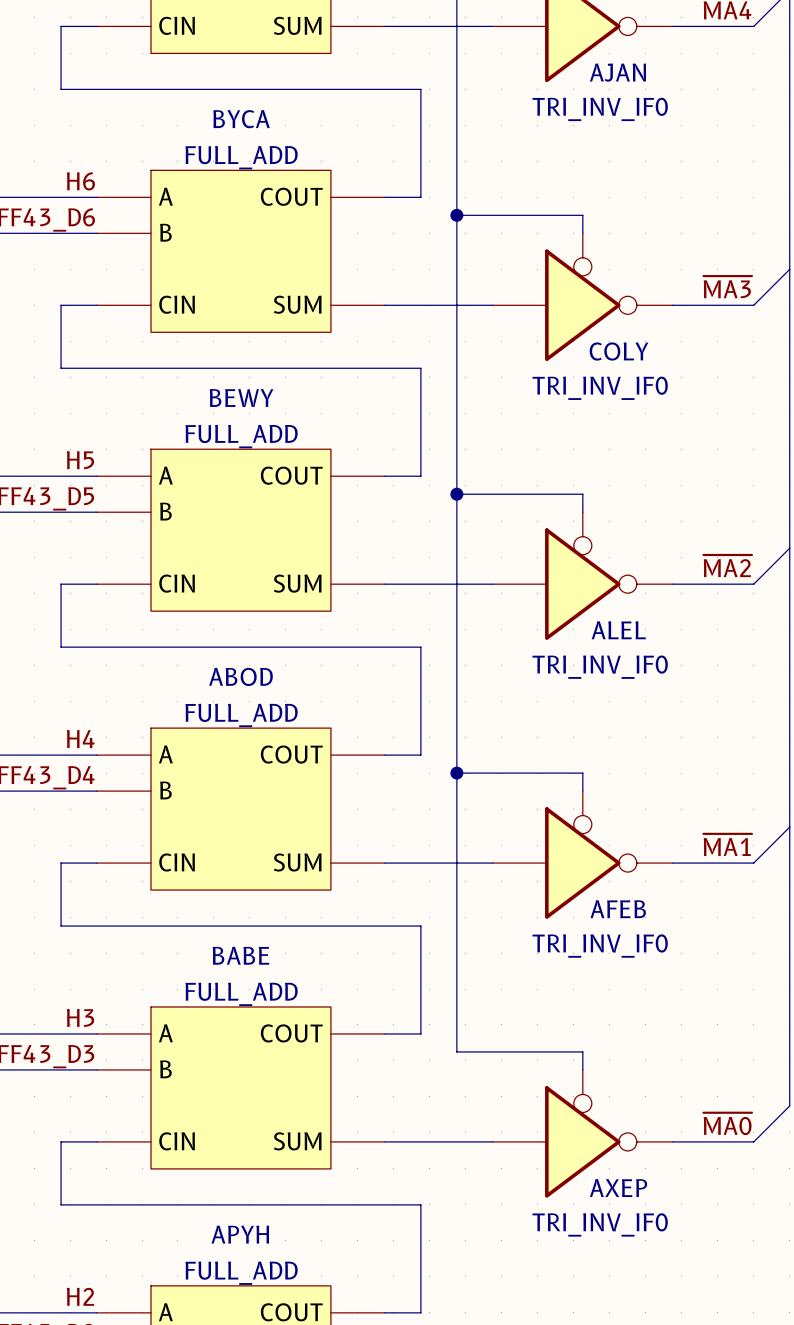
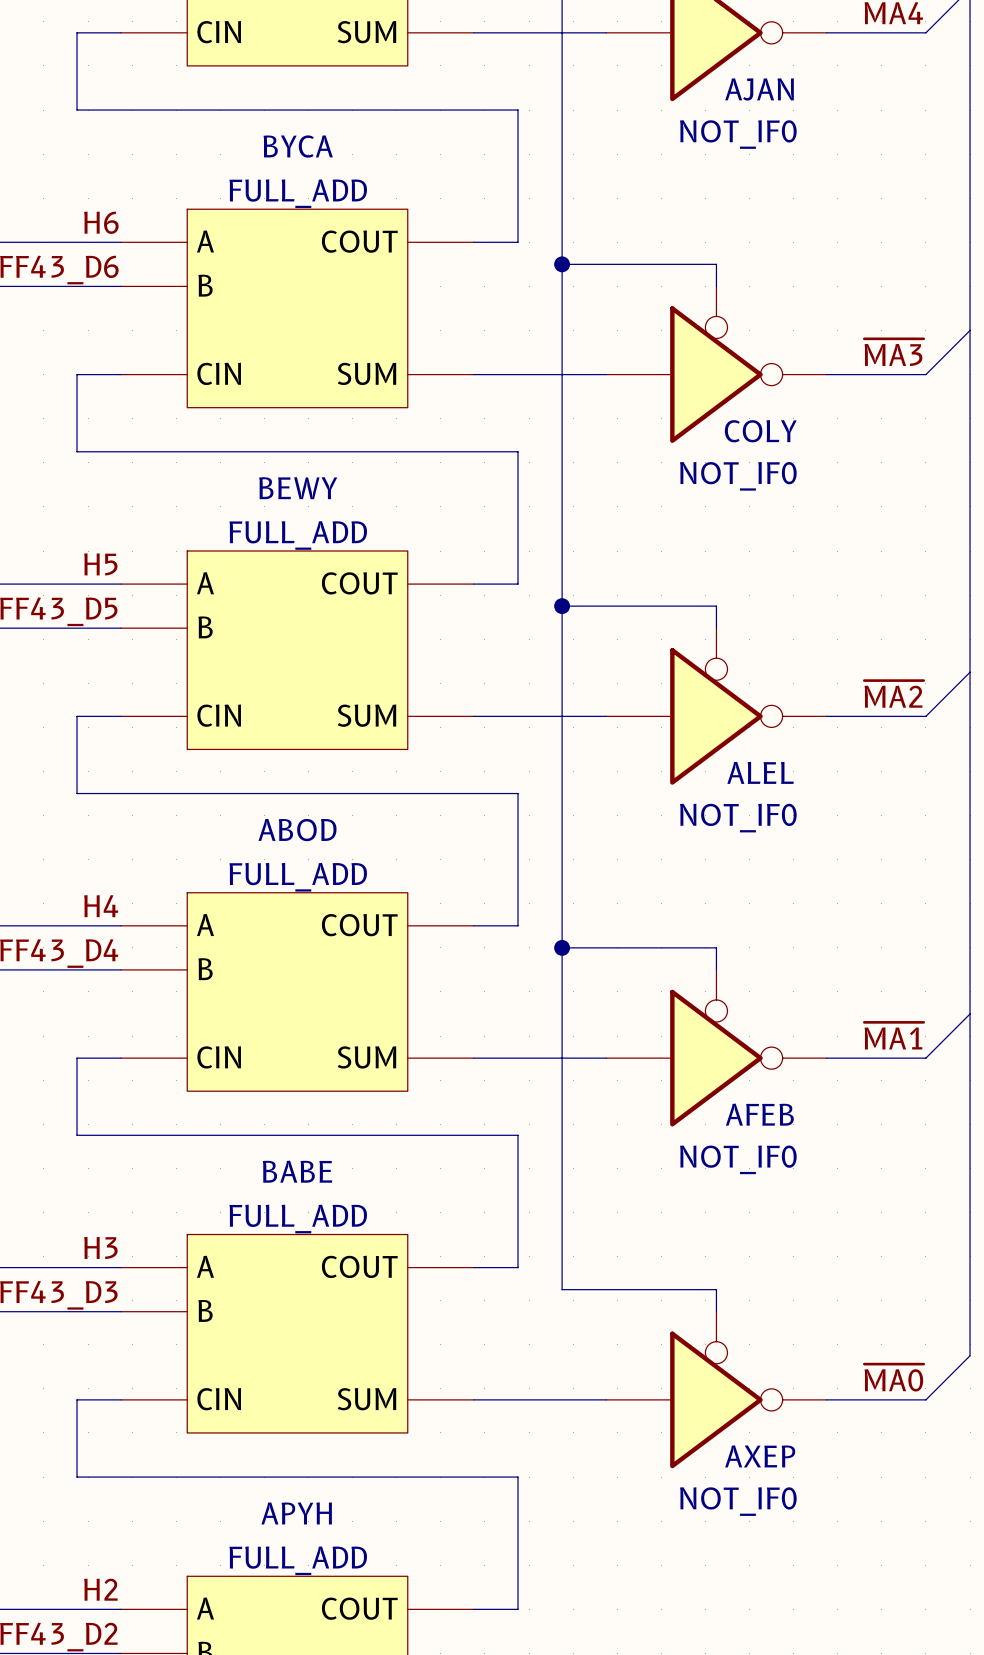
AJAN value: TRI_INV_IF0 (600, 109) -> NOT_IF0 (738, 134)
COLY value: TRI_INV_IF0 (600, 388) -> NOT_IF0 (738, 476)
ALEL value: TRI_INV_IF0 (600, 667) -> NOT_IF0 (738, 818)
AFEB value: TRI_INV_IF0 (600, 946) -> NOT_IF0 (738, 1159)
AXEP value: TRI_INV_IF0 (600, 1224) -> NOT_IF0 (738, 1501)

